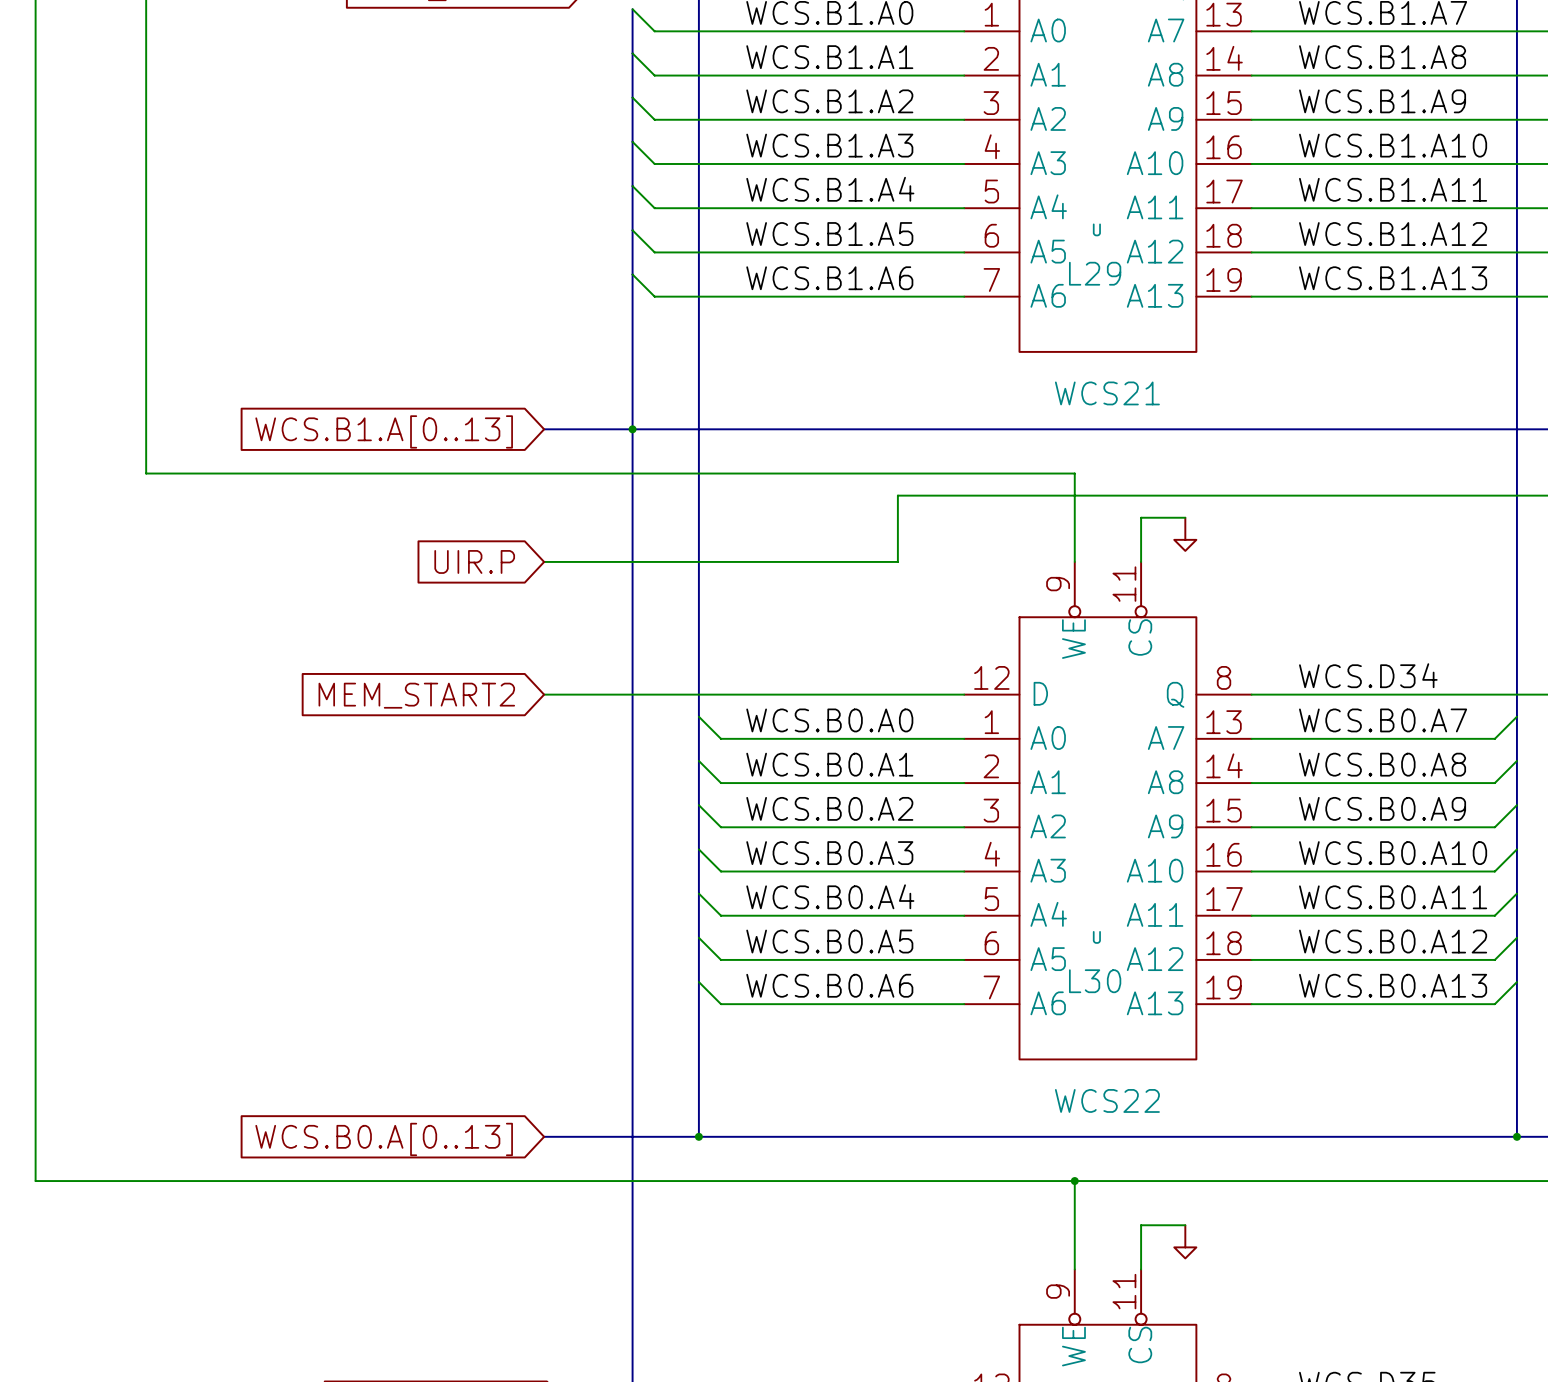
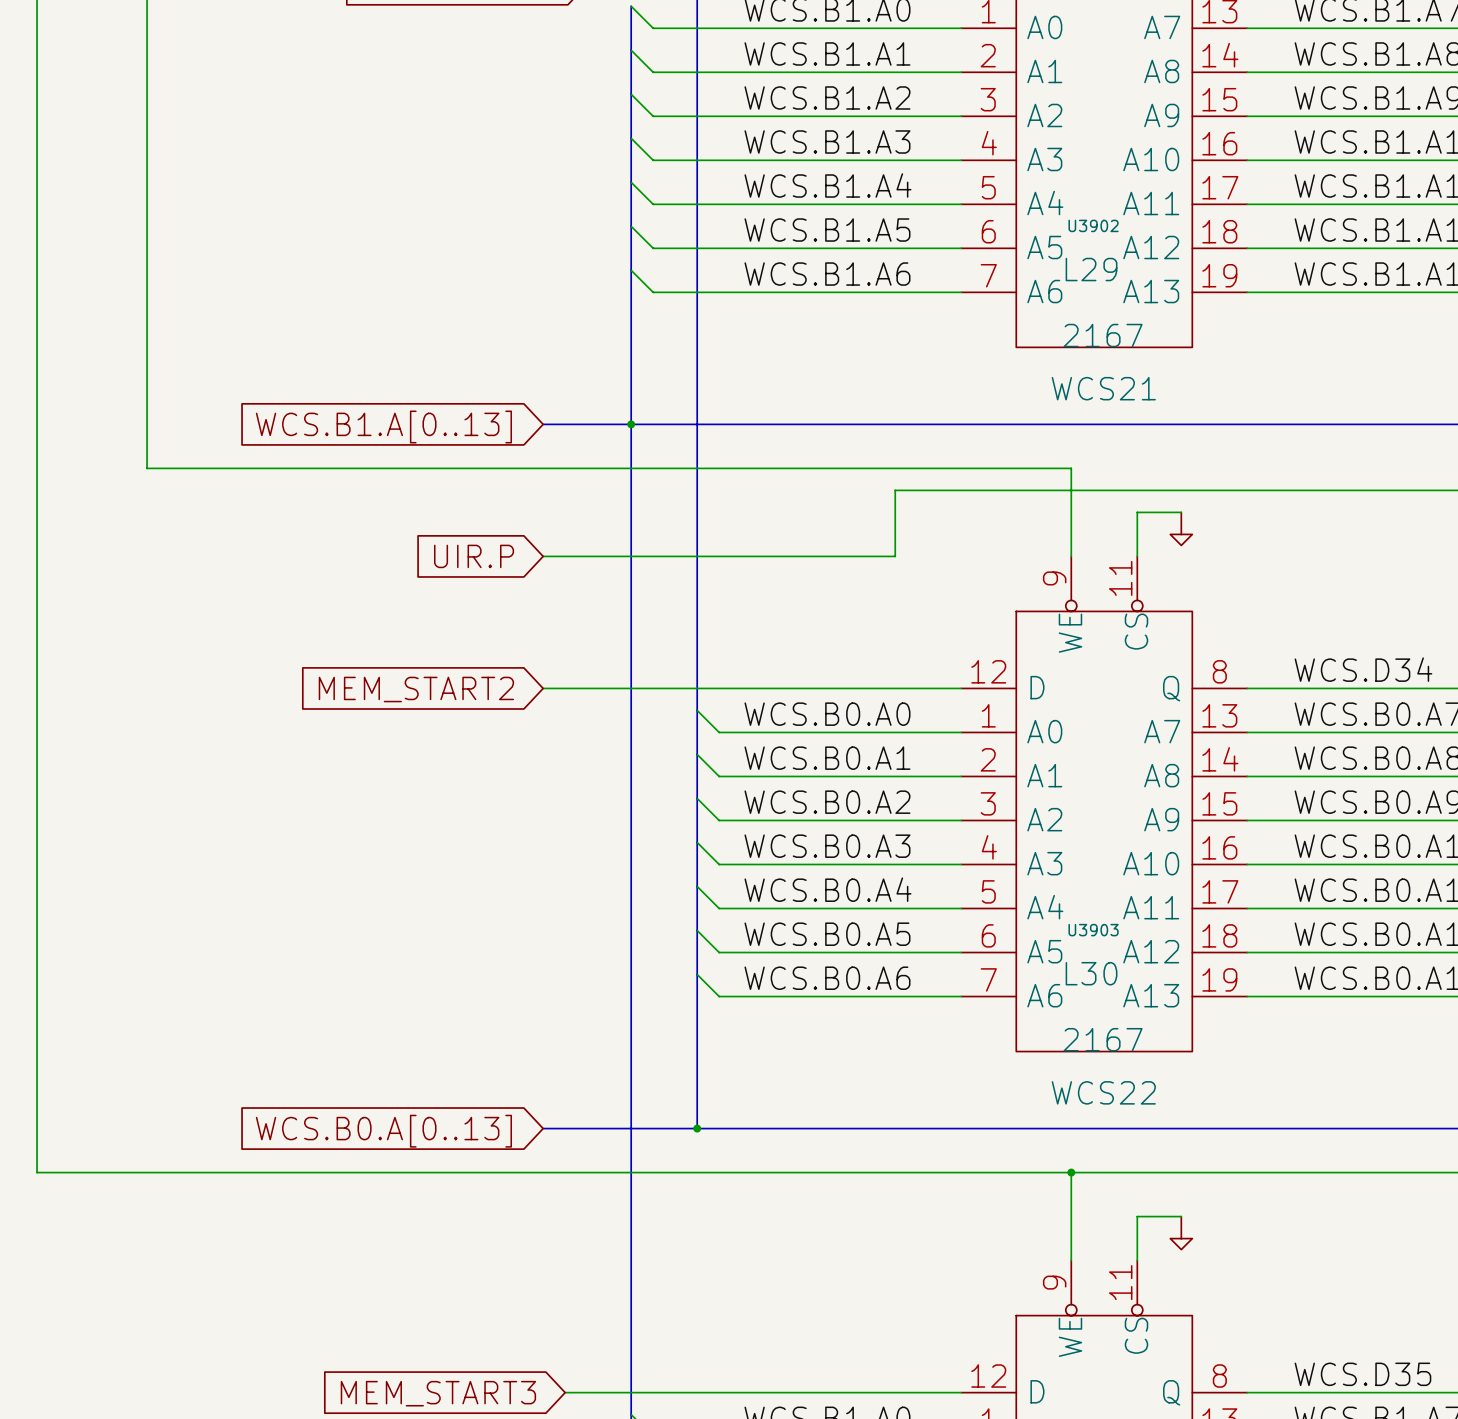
U name: U (1096, 229) -> U3902 (1093, 225)
U value: none -> 2167 (1103, 335)
U name: U (1096, 937) -> U3903 (1093, 930)
U value: none -> 2167 (1103, 1039)

